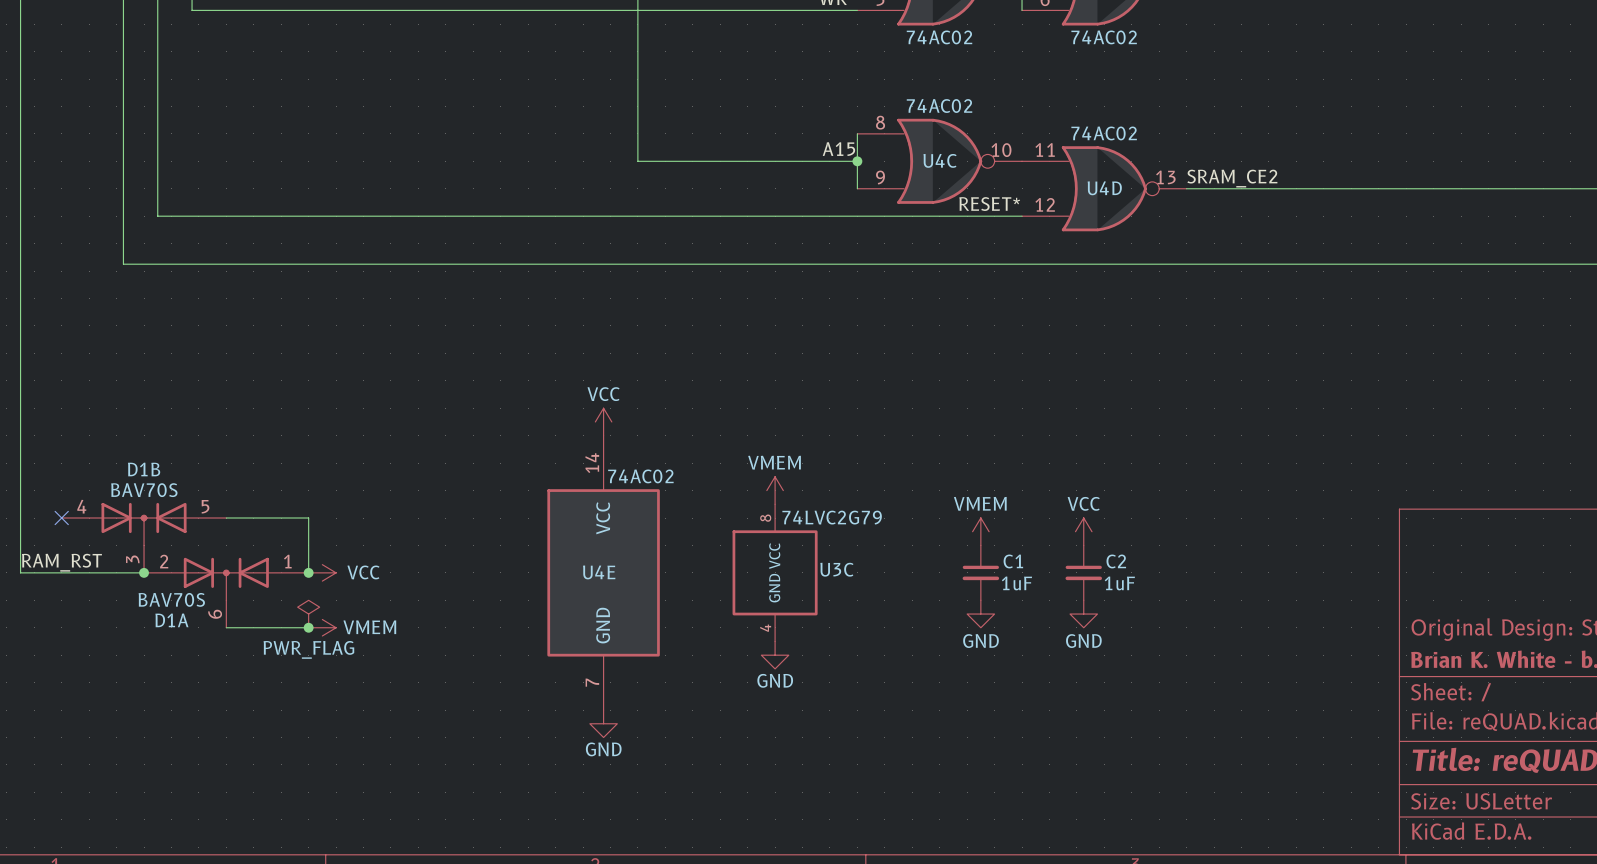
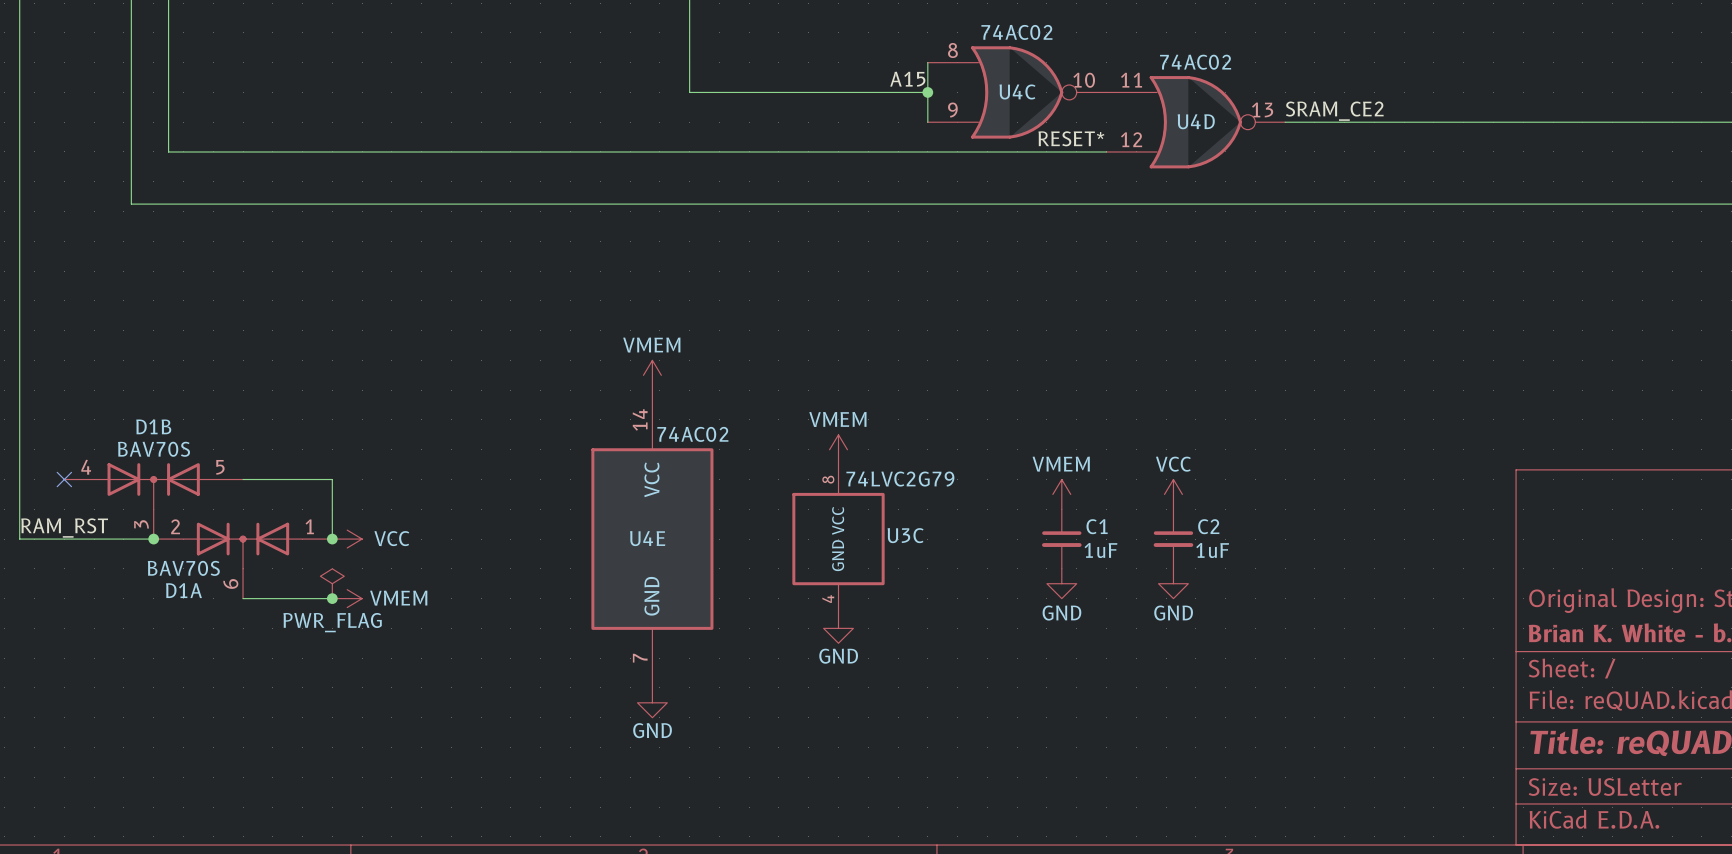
power symbol: VCC (603, 421) -> VMEM (652, 375)

